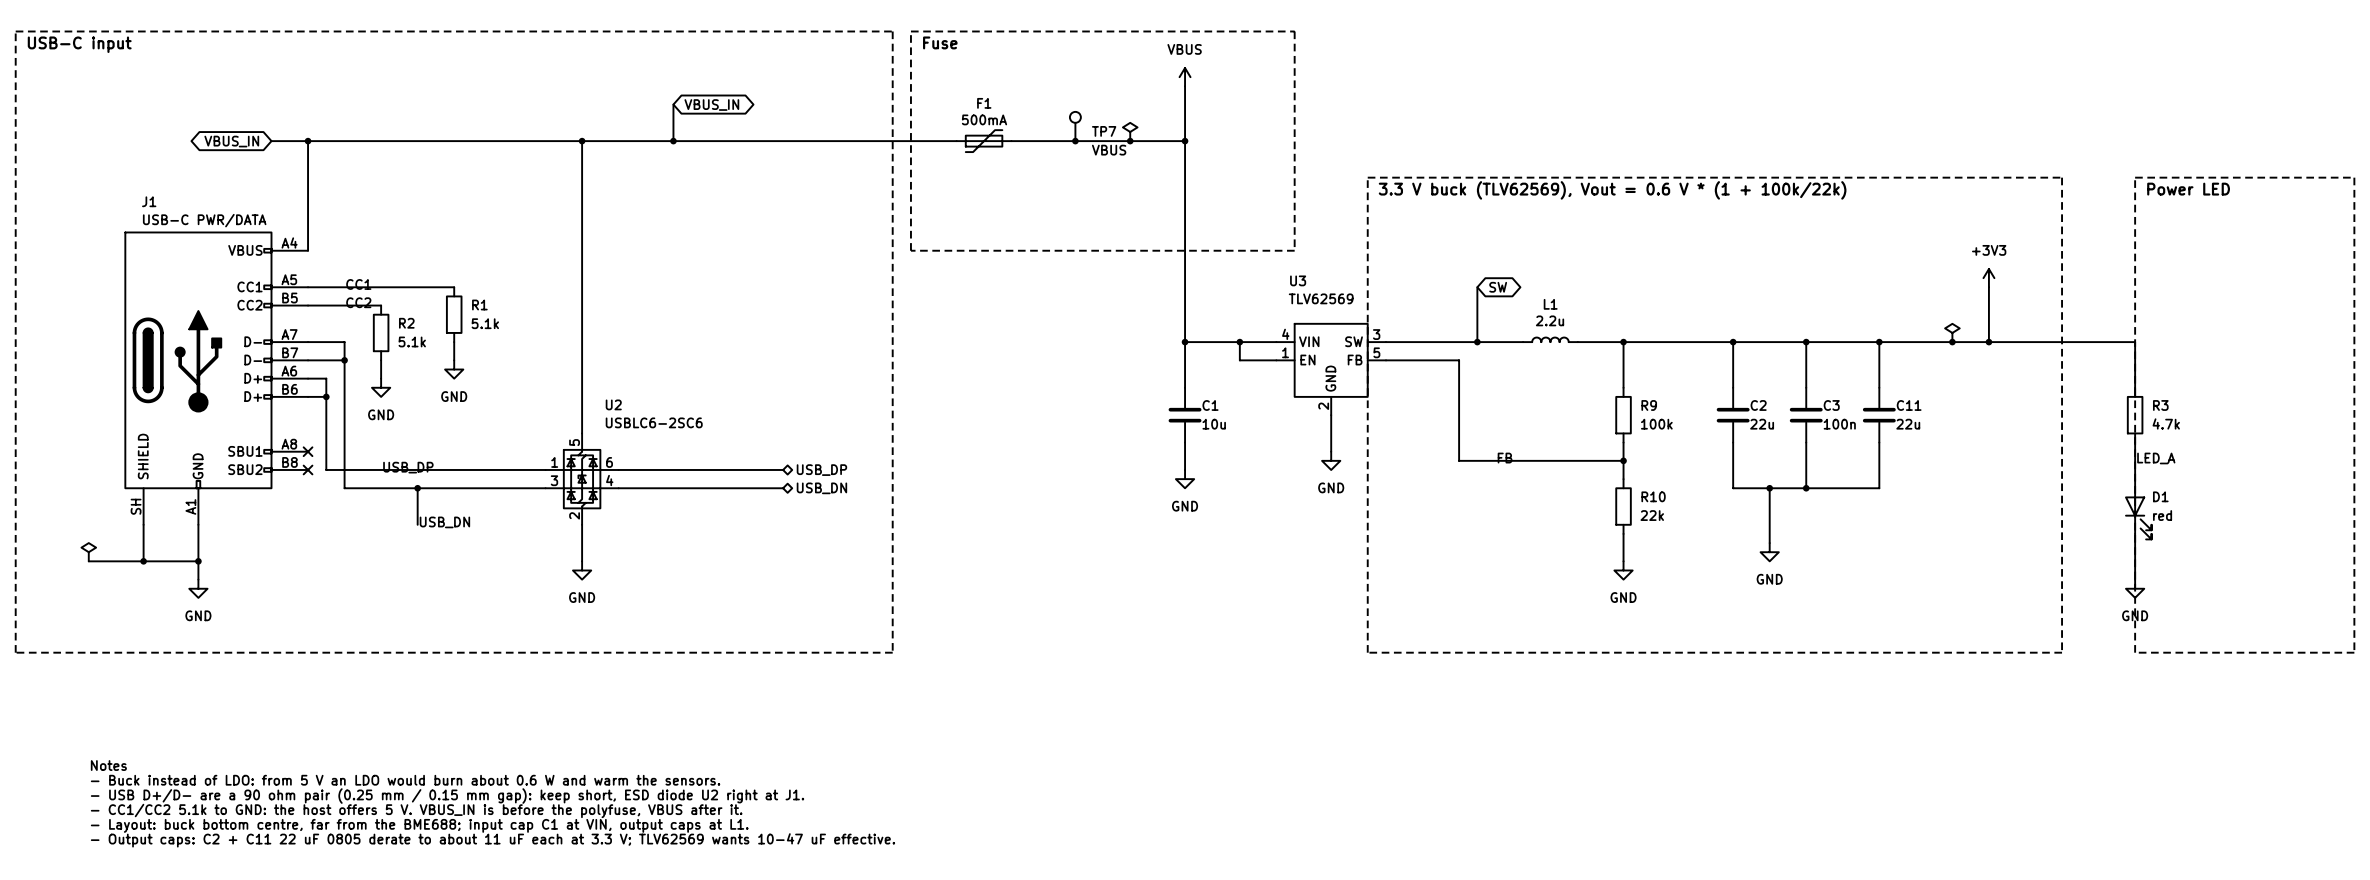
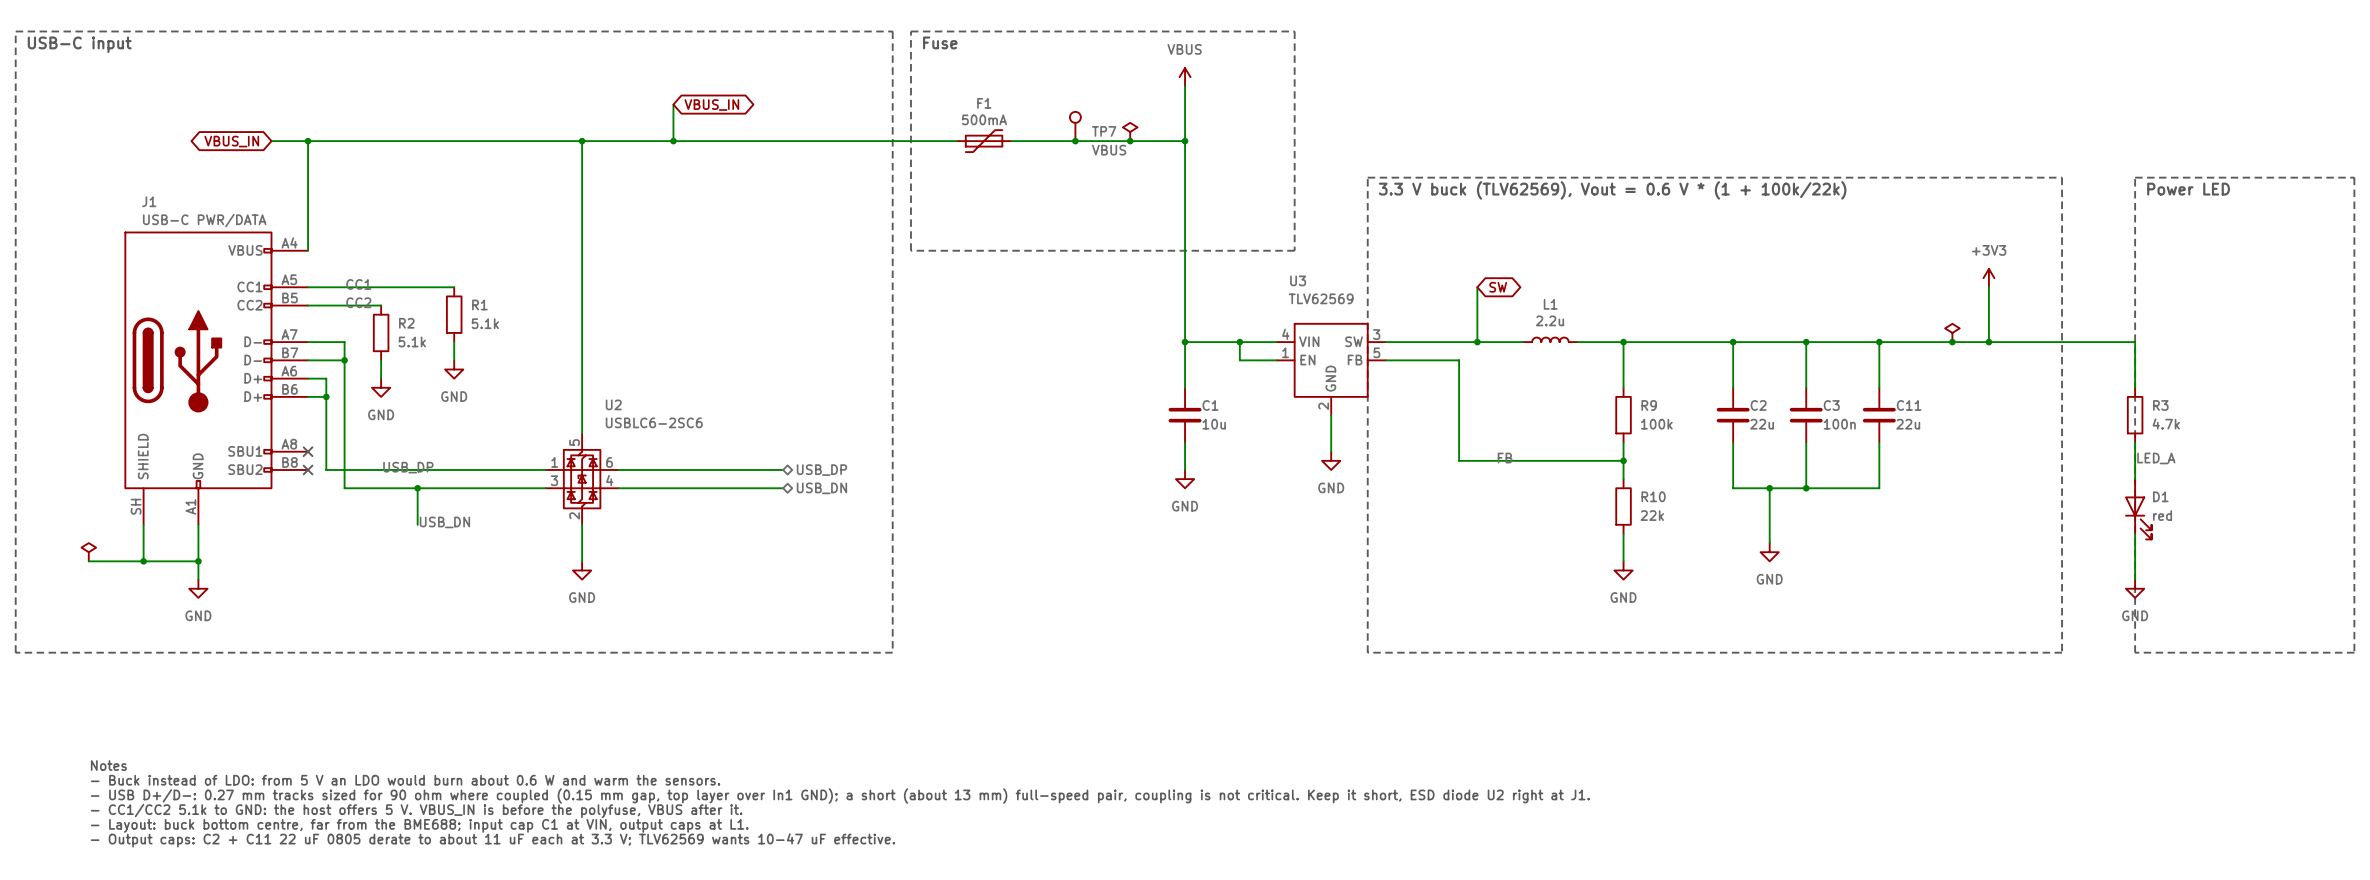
text: - USB D+/D- are a 90 ohm pair (0.25 mm / 0.15 mm gap): keep short, ESD diode U2 right at J1. (447, 796) -> - USB D+/D-: 0.27 mm tracks sized for 90 ohm where coupled (0.15 mm gap, top layer over In1 GND); a short (about 13 mm) full-speed pair, coupling is not critical. Keep it short, ESD diode U2 right at J1. (840, 796)

